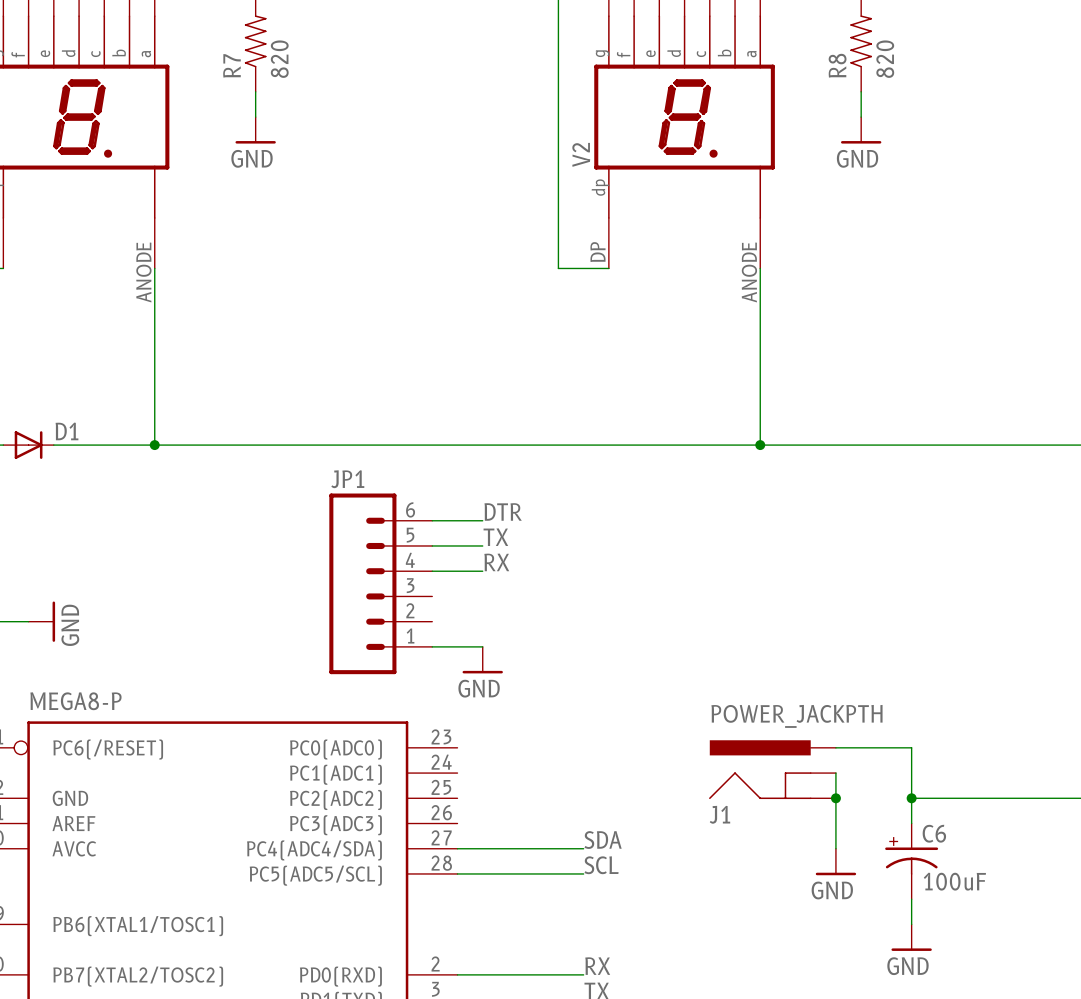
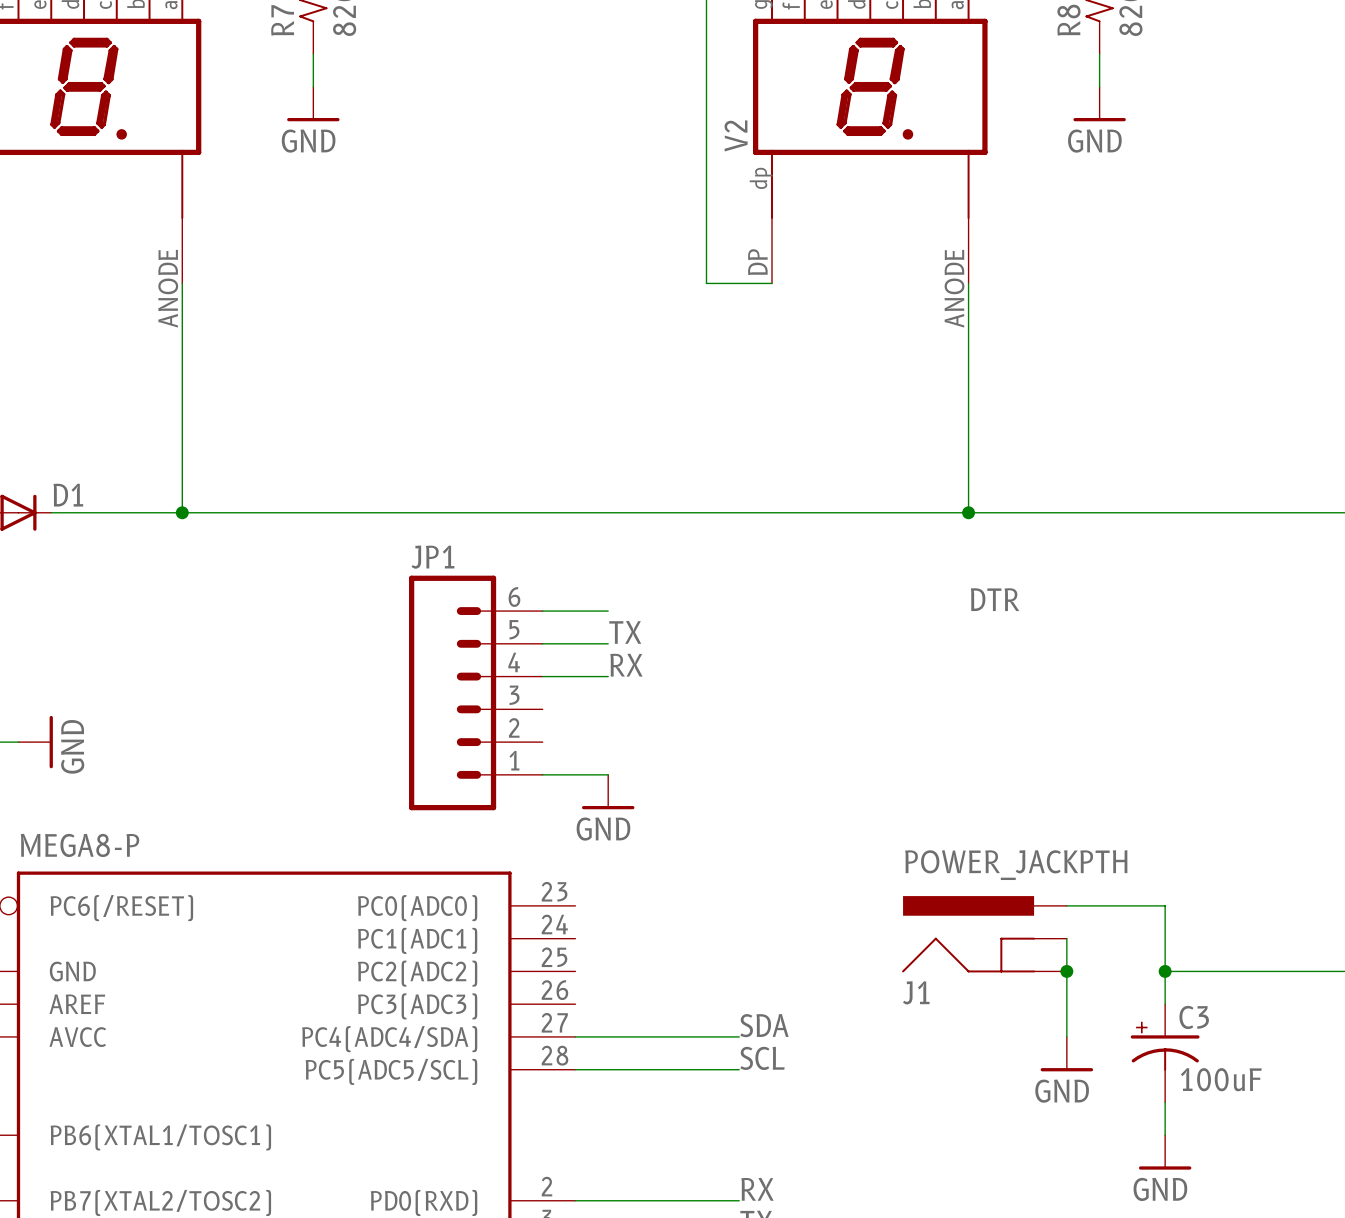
label: DTR (503, 511) -> none
label: none -> DTR (995, 599)
C6 name: C6 (934, 833) -> C3 (1194, 1017)

